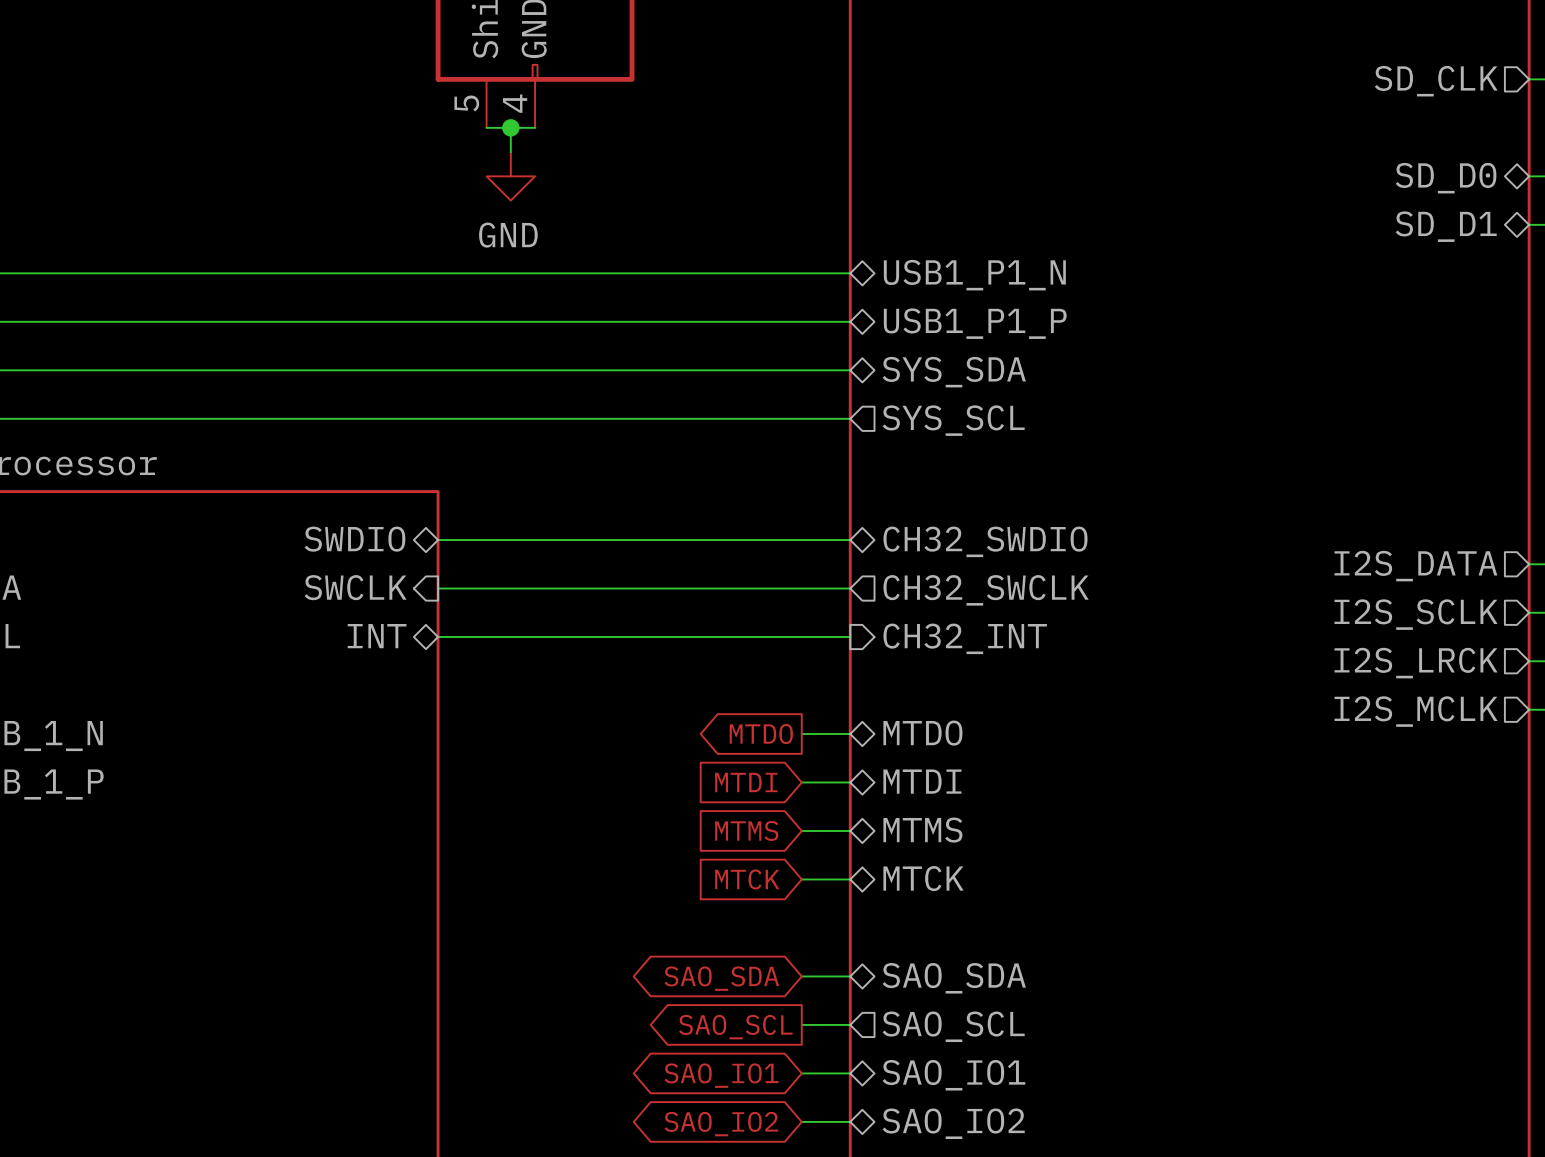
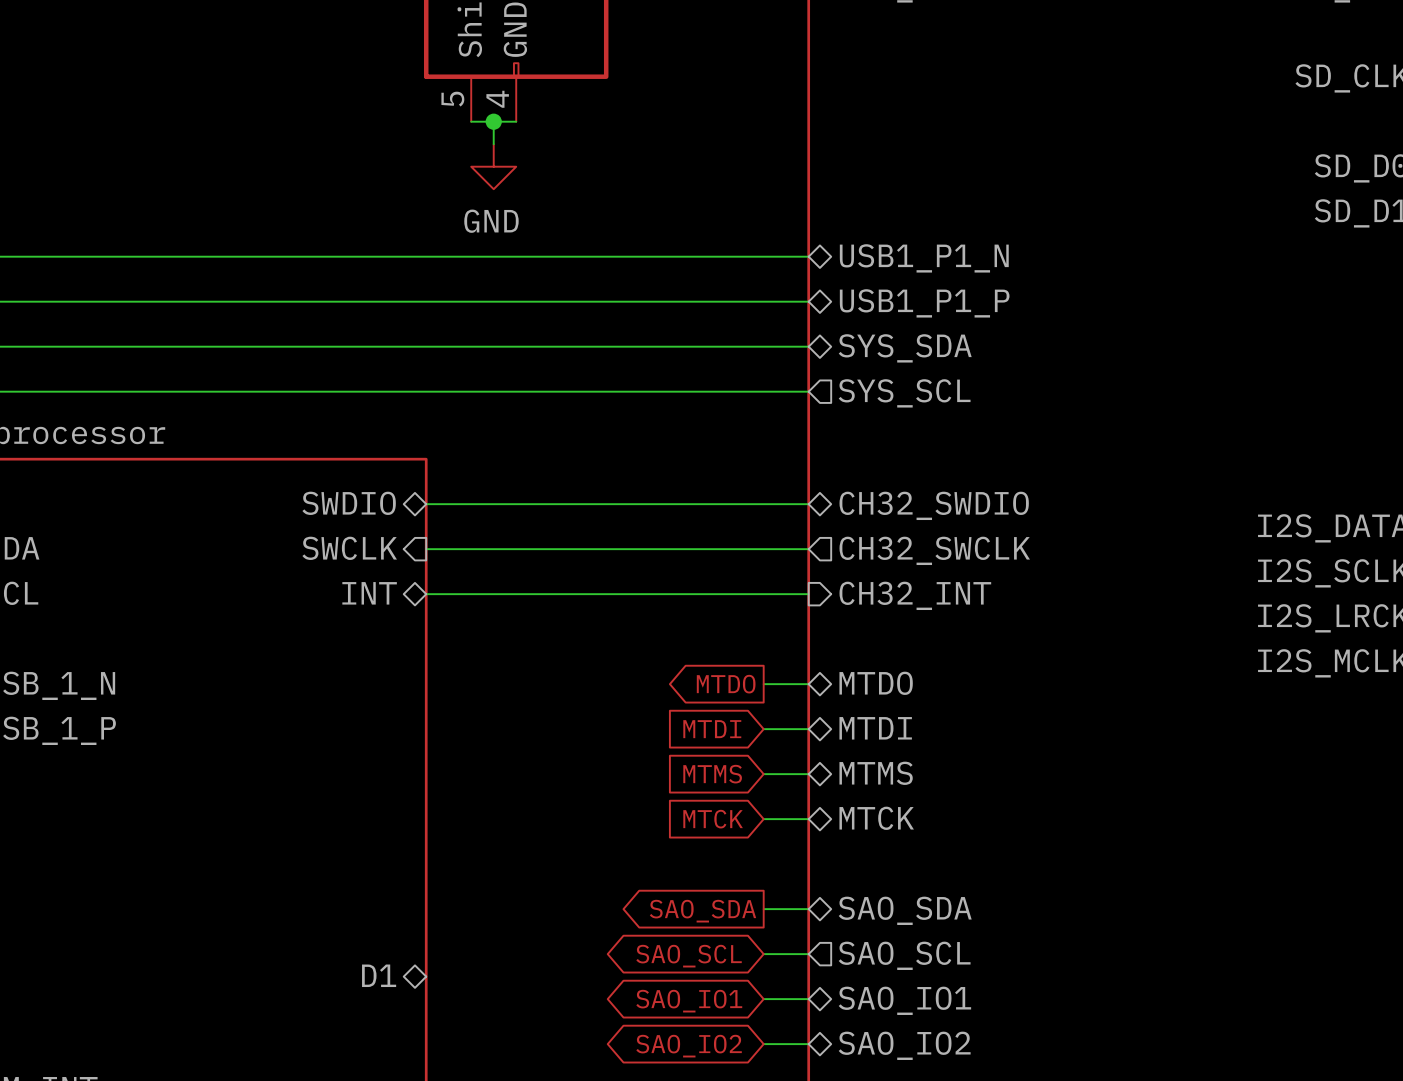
global label shape: bidirectional (721, 978) -> output (702, 911)
global label shape: output (735, 1027) -> bidirectional (689, 956)
sheet pin: none -> D1 (379, 975)

